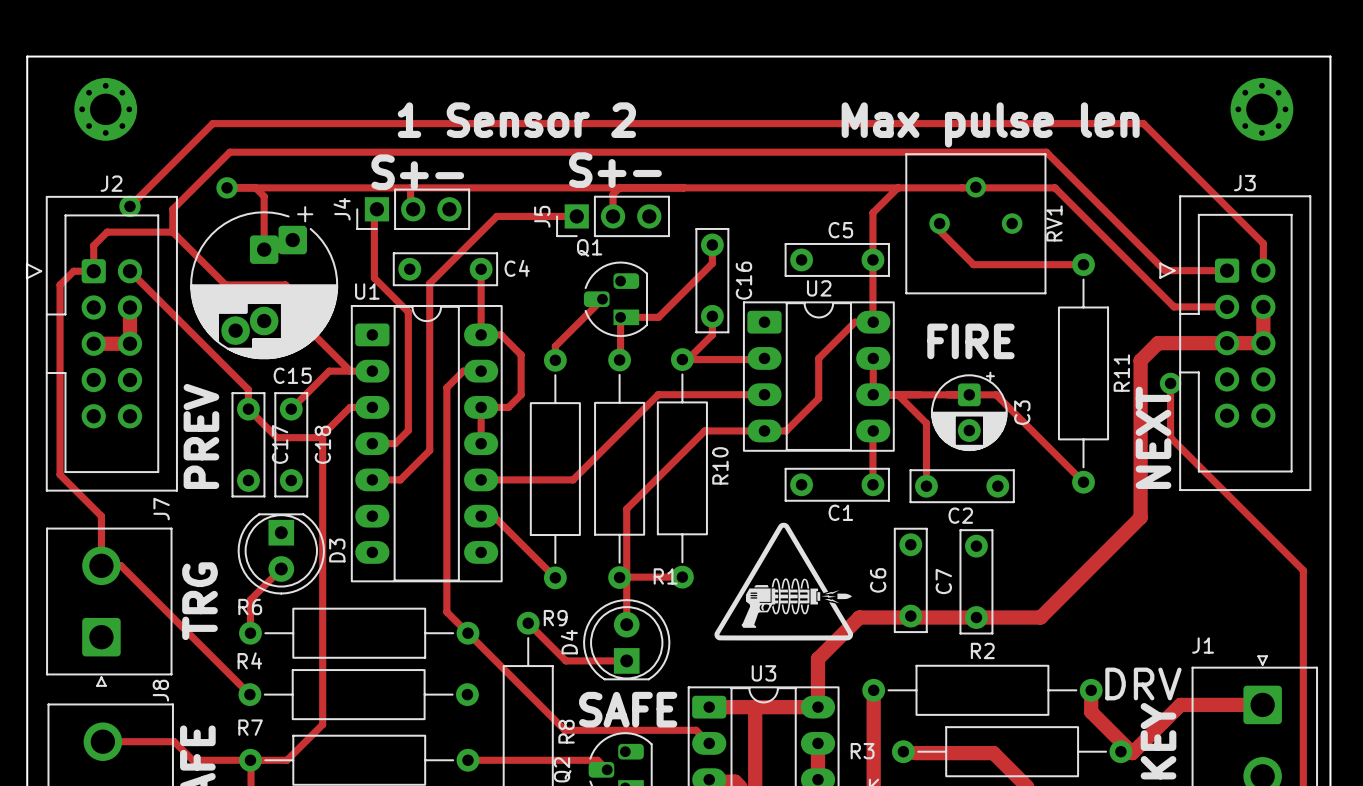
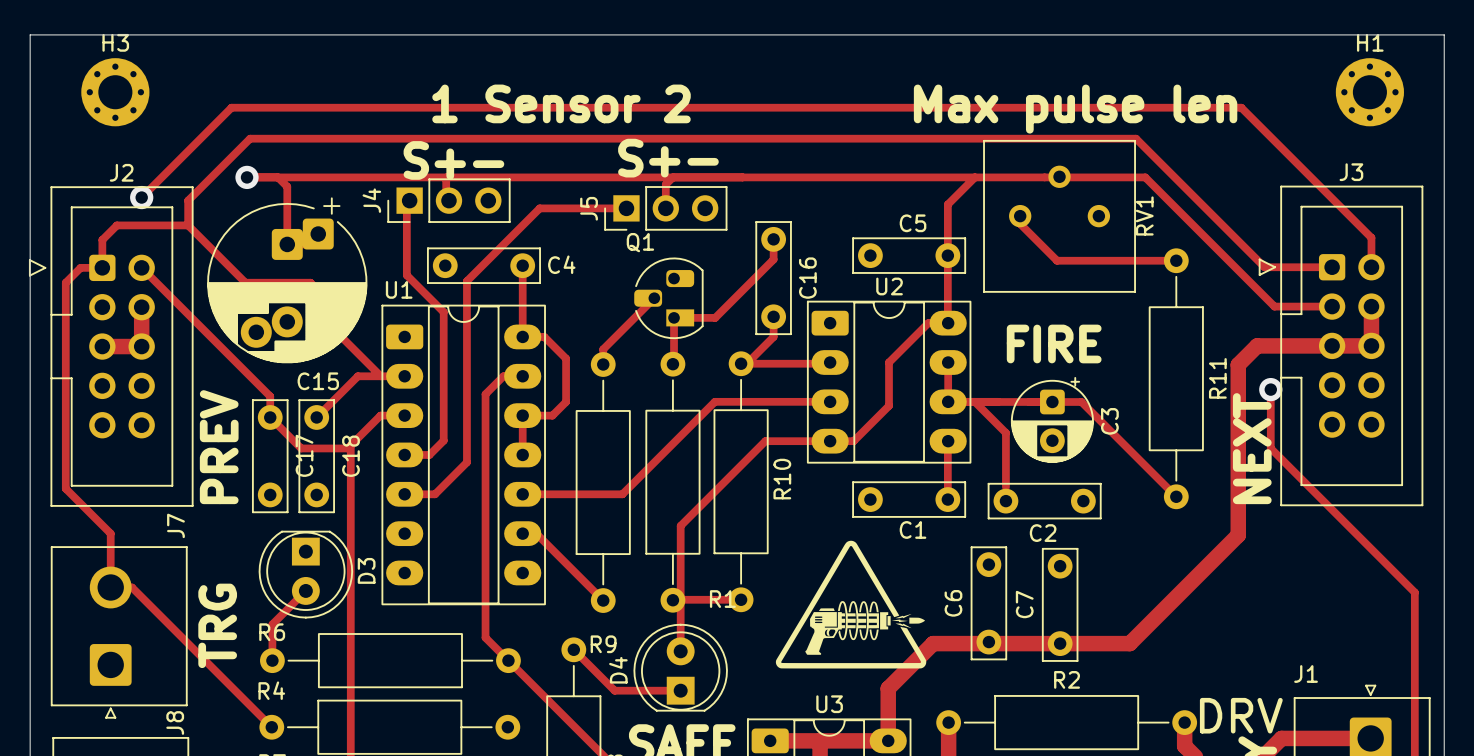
H3 name: none -> H3 (115, 42)
H1 name: none -> H1 (1370, 42)

